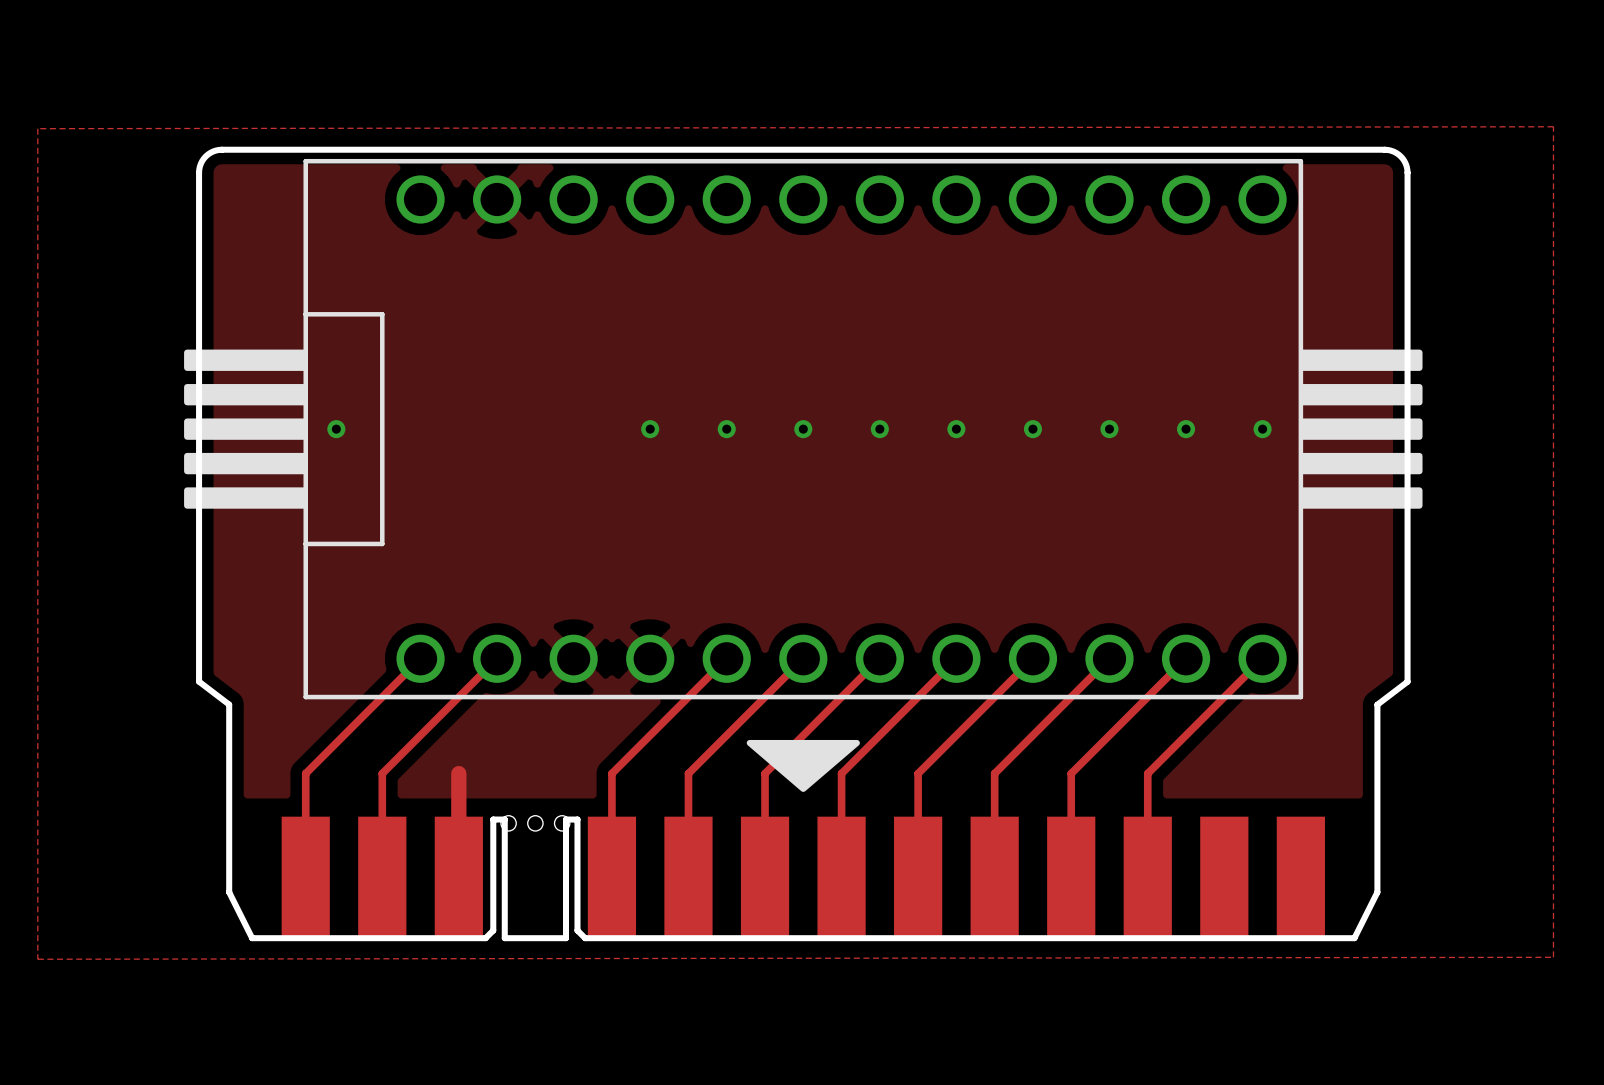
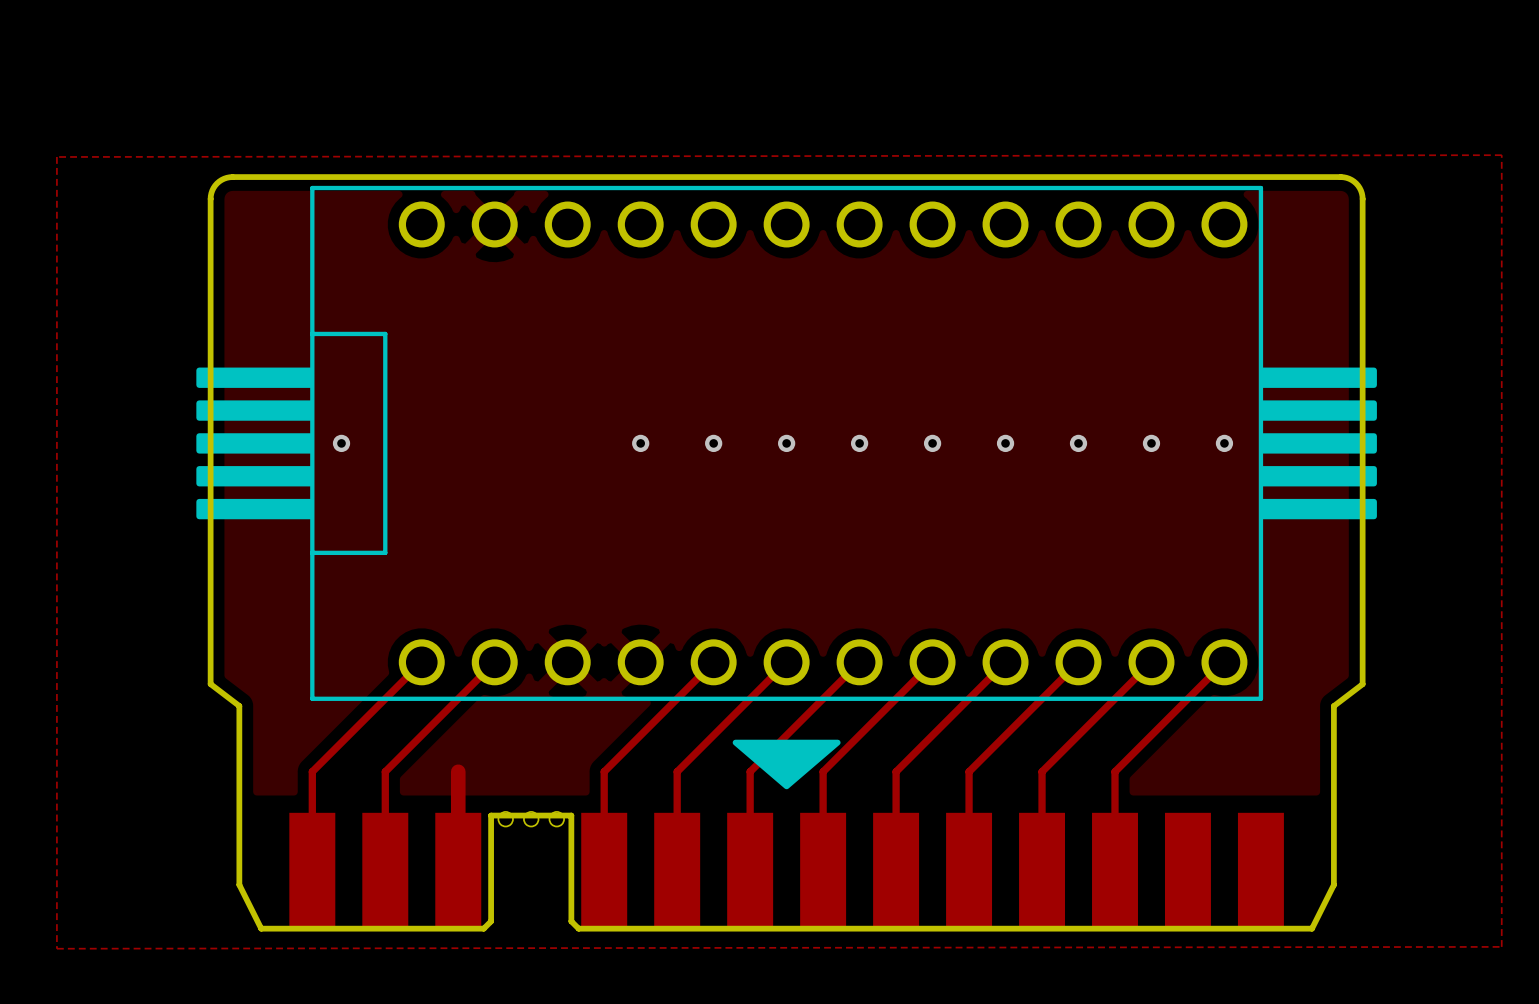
board edge: (504, 819) (504, 938) (566, 938) (566, 819) -> (502, 815) (560, 815)

